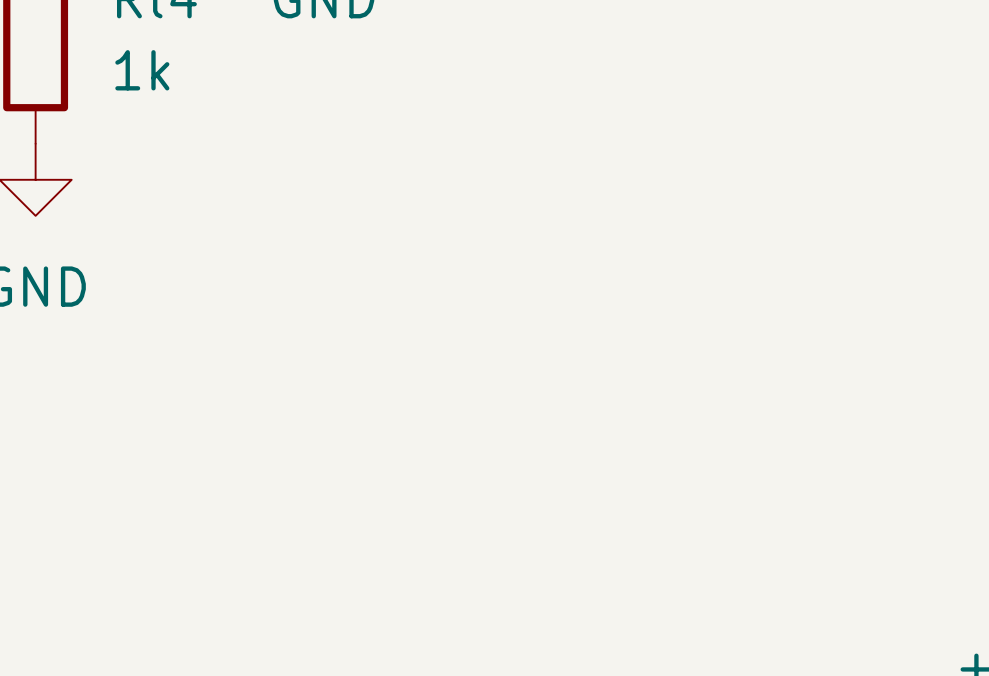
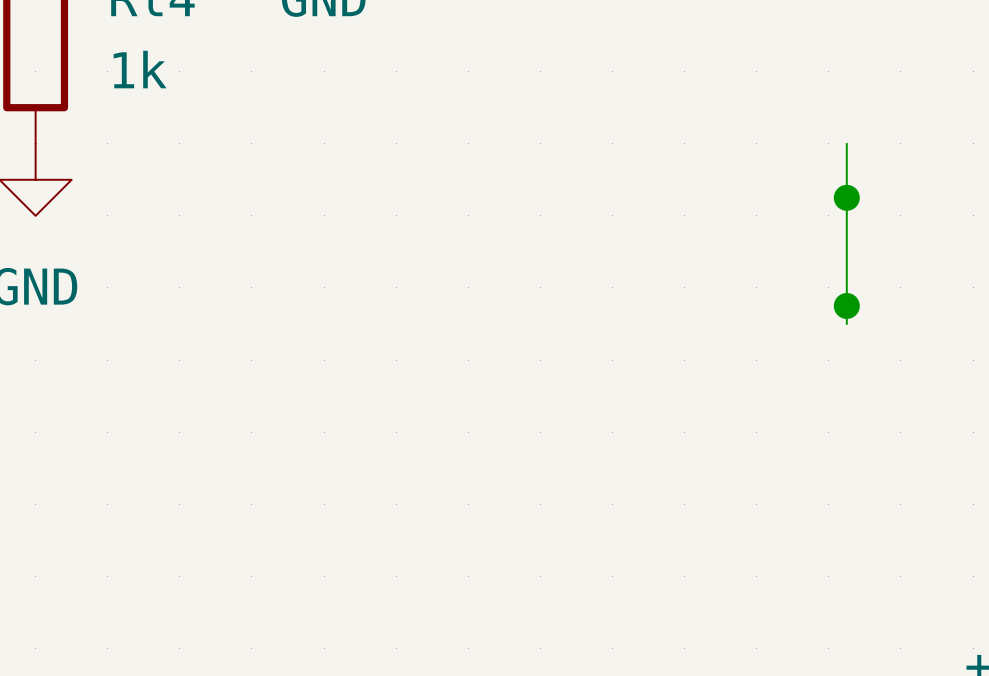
wire: none -> (846, 143) (846, 324)
junction: none -> (846, 197)
junction: none -> (846, 305)

